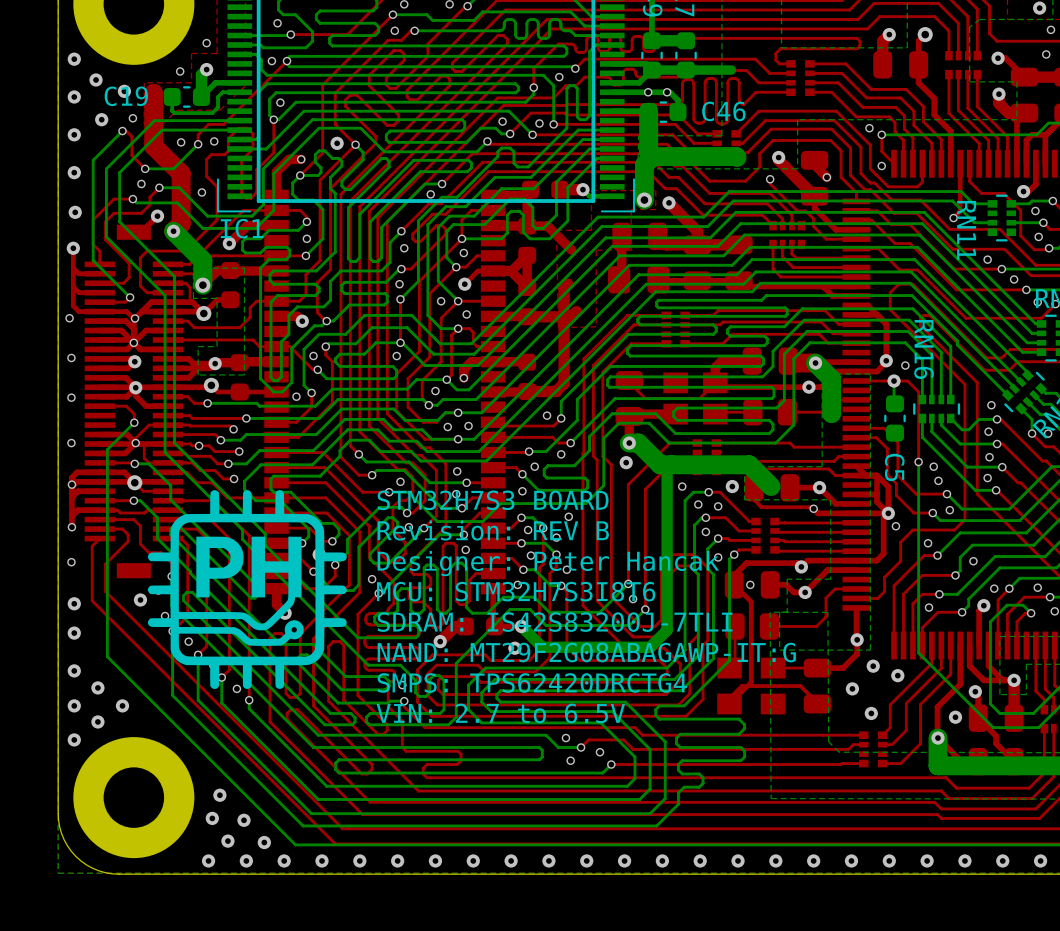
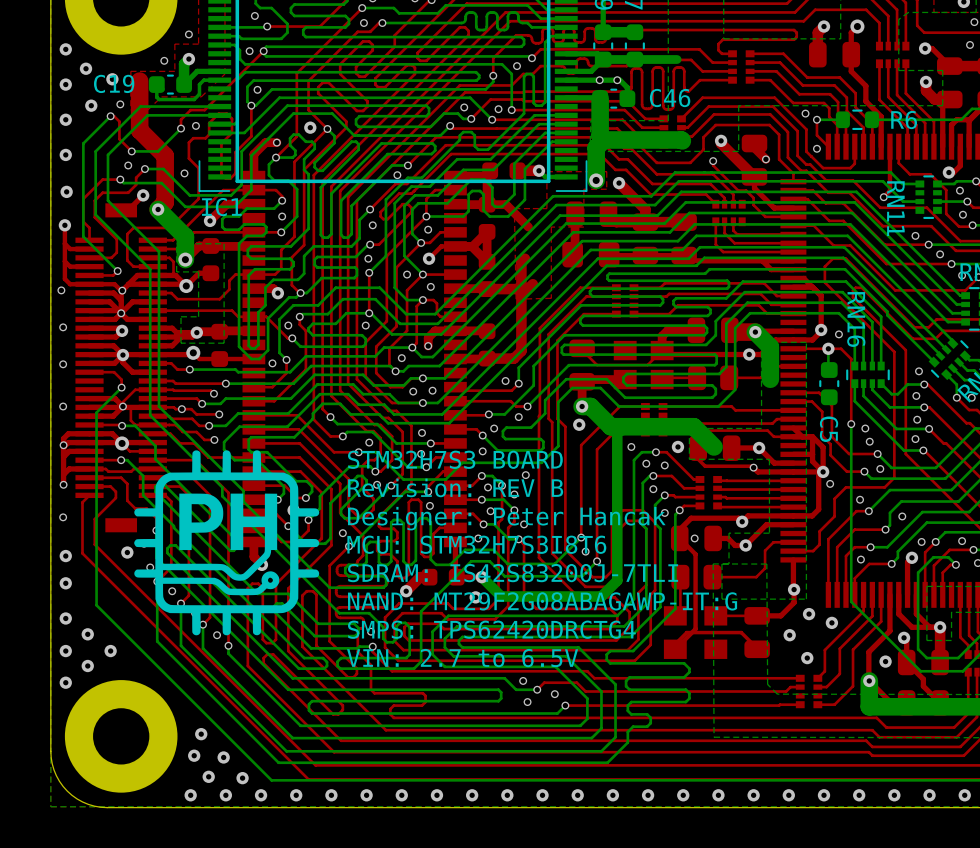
R6: none -> (857, 119)
bottom track: (940, 134) (909, 134) -> none
via: (181, 142) -> none

